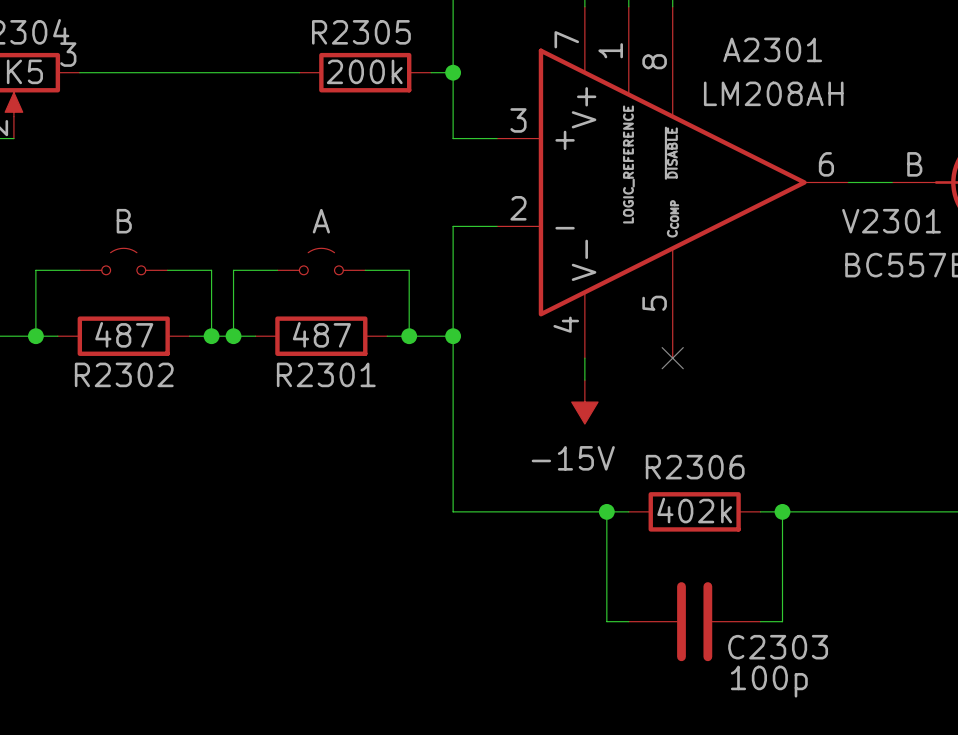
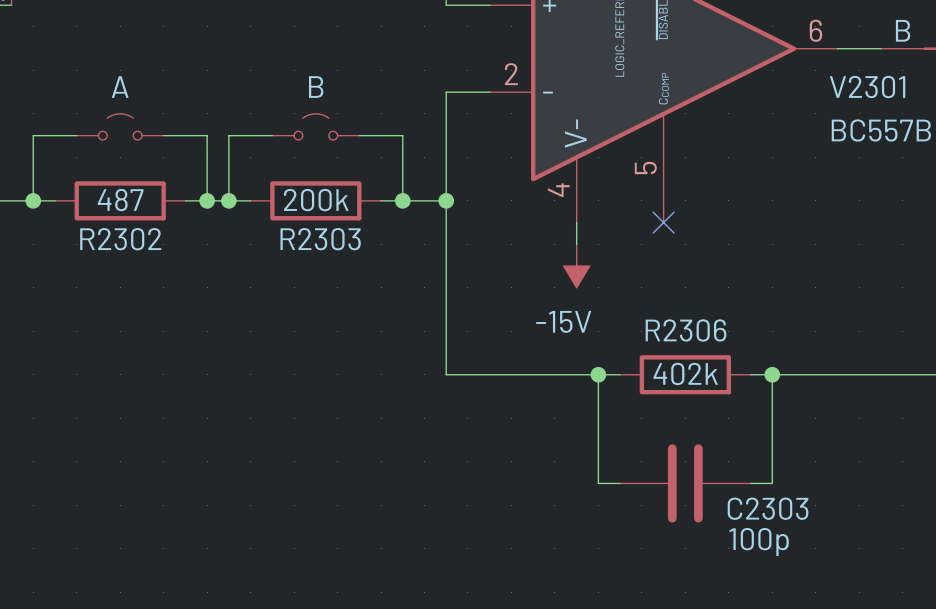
part value: B (124, 221) -> A (120, 87)
part value: A (321, 221) -> B (316, 87)
R2301 value: 487 (321, 334) -> 200k (316, 200)
R2301 name: R2301 (326, 374) -> R2303 (320, 239)

